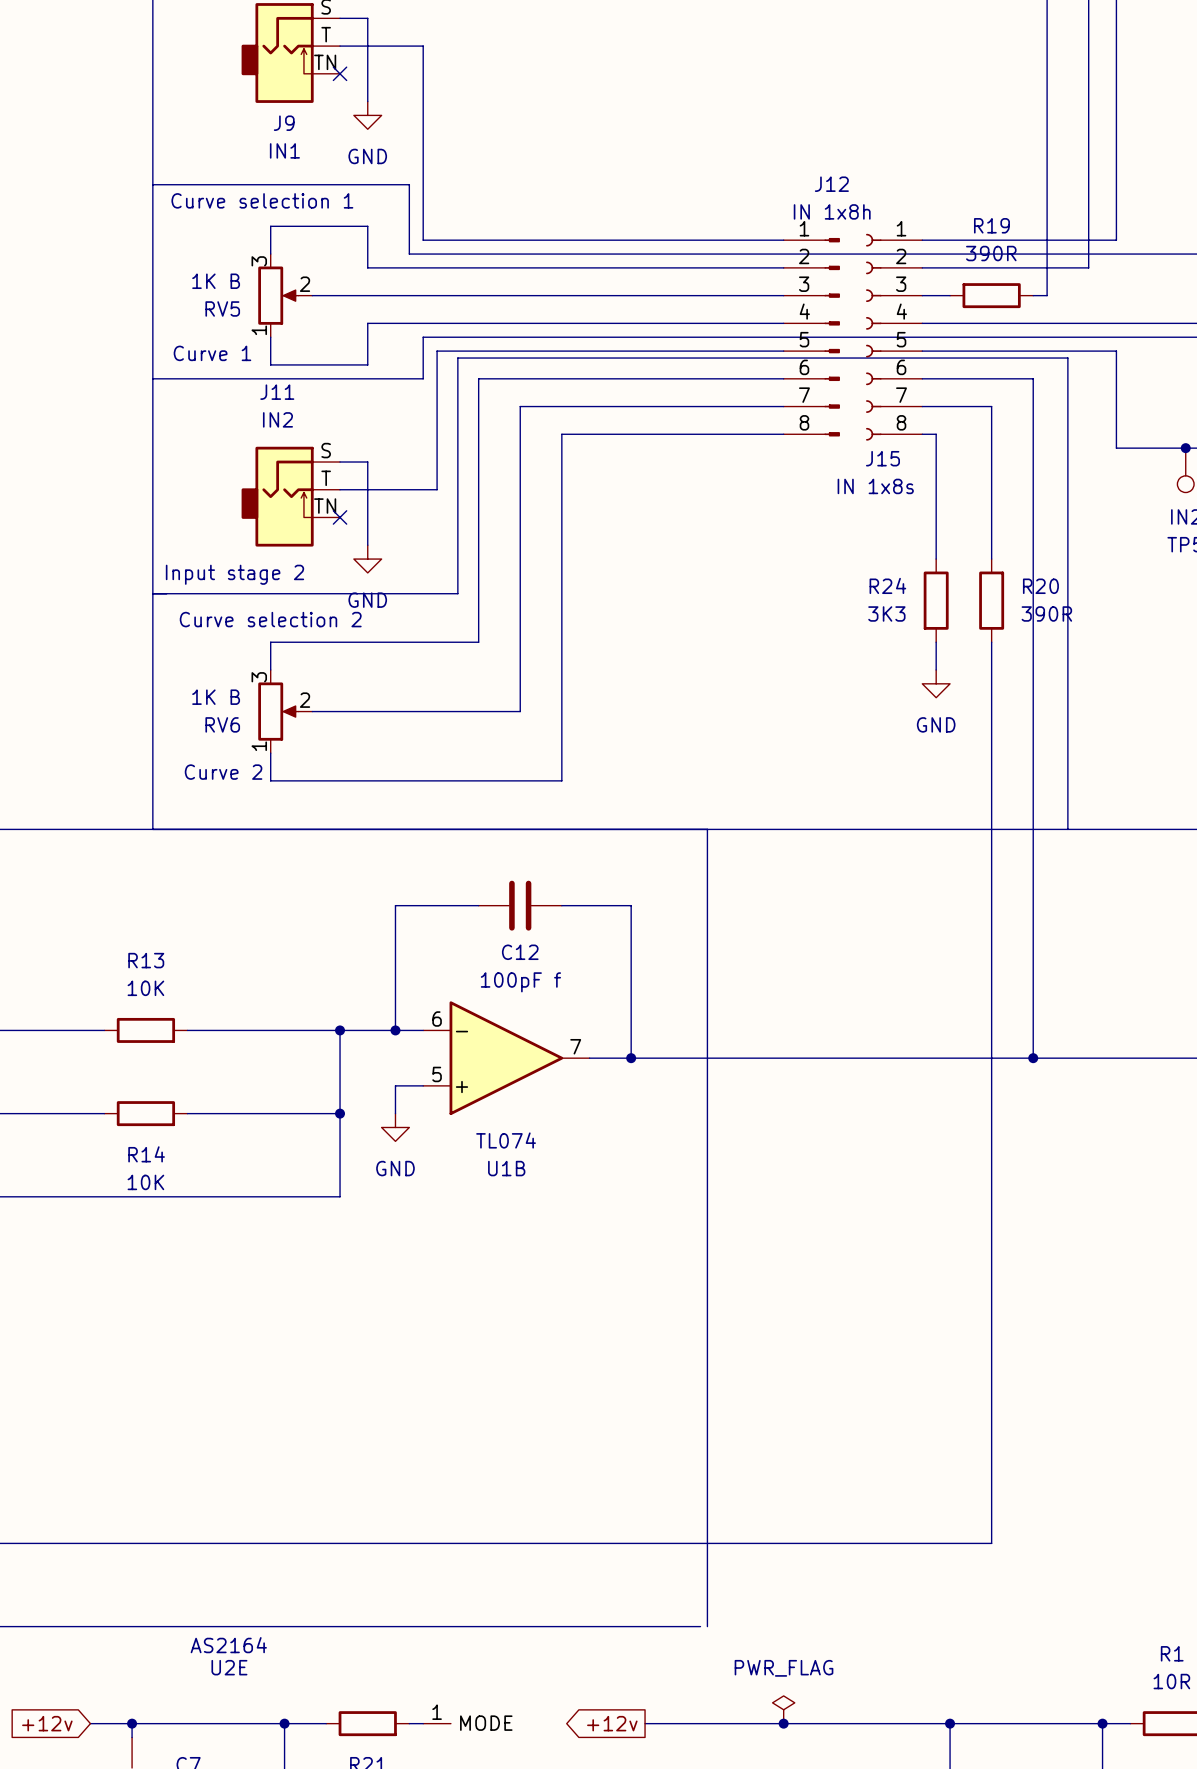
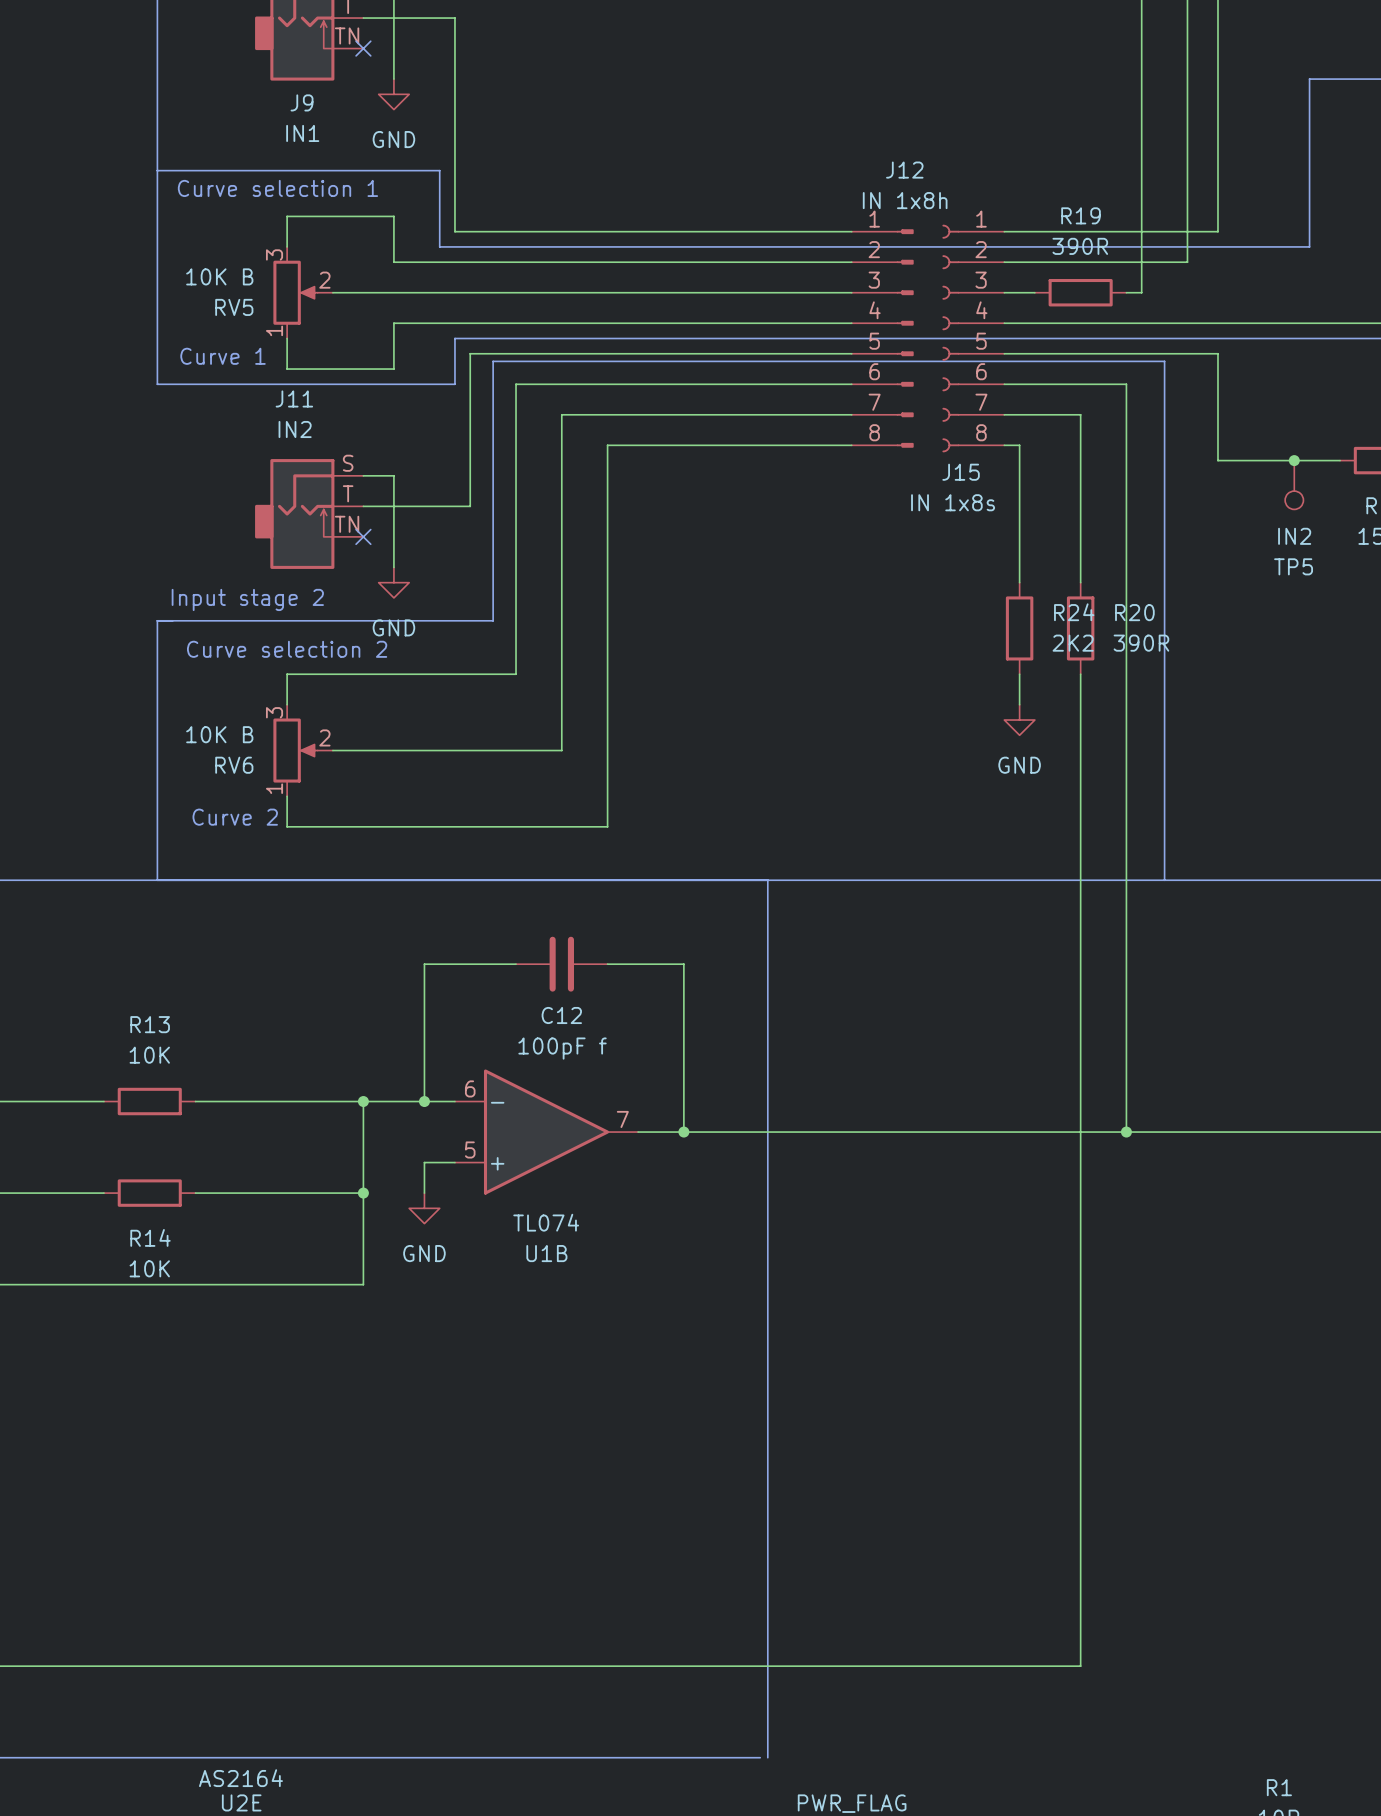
RV5 value: 1K B (216, 281) -> 10K B (219, 276)
line: (152, 378) (152, 593) -> none
R24 name position: R24 (887, 585) -> R24 (1074, 612)
R24 value: 3K3 (886, 613) -> 2K2 (1073, 643)
RV6 value: 1K B (216, 697) -> 10K B (219, 734)

